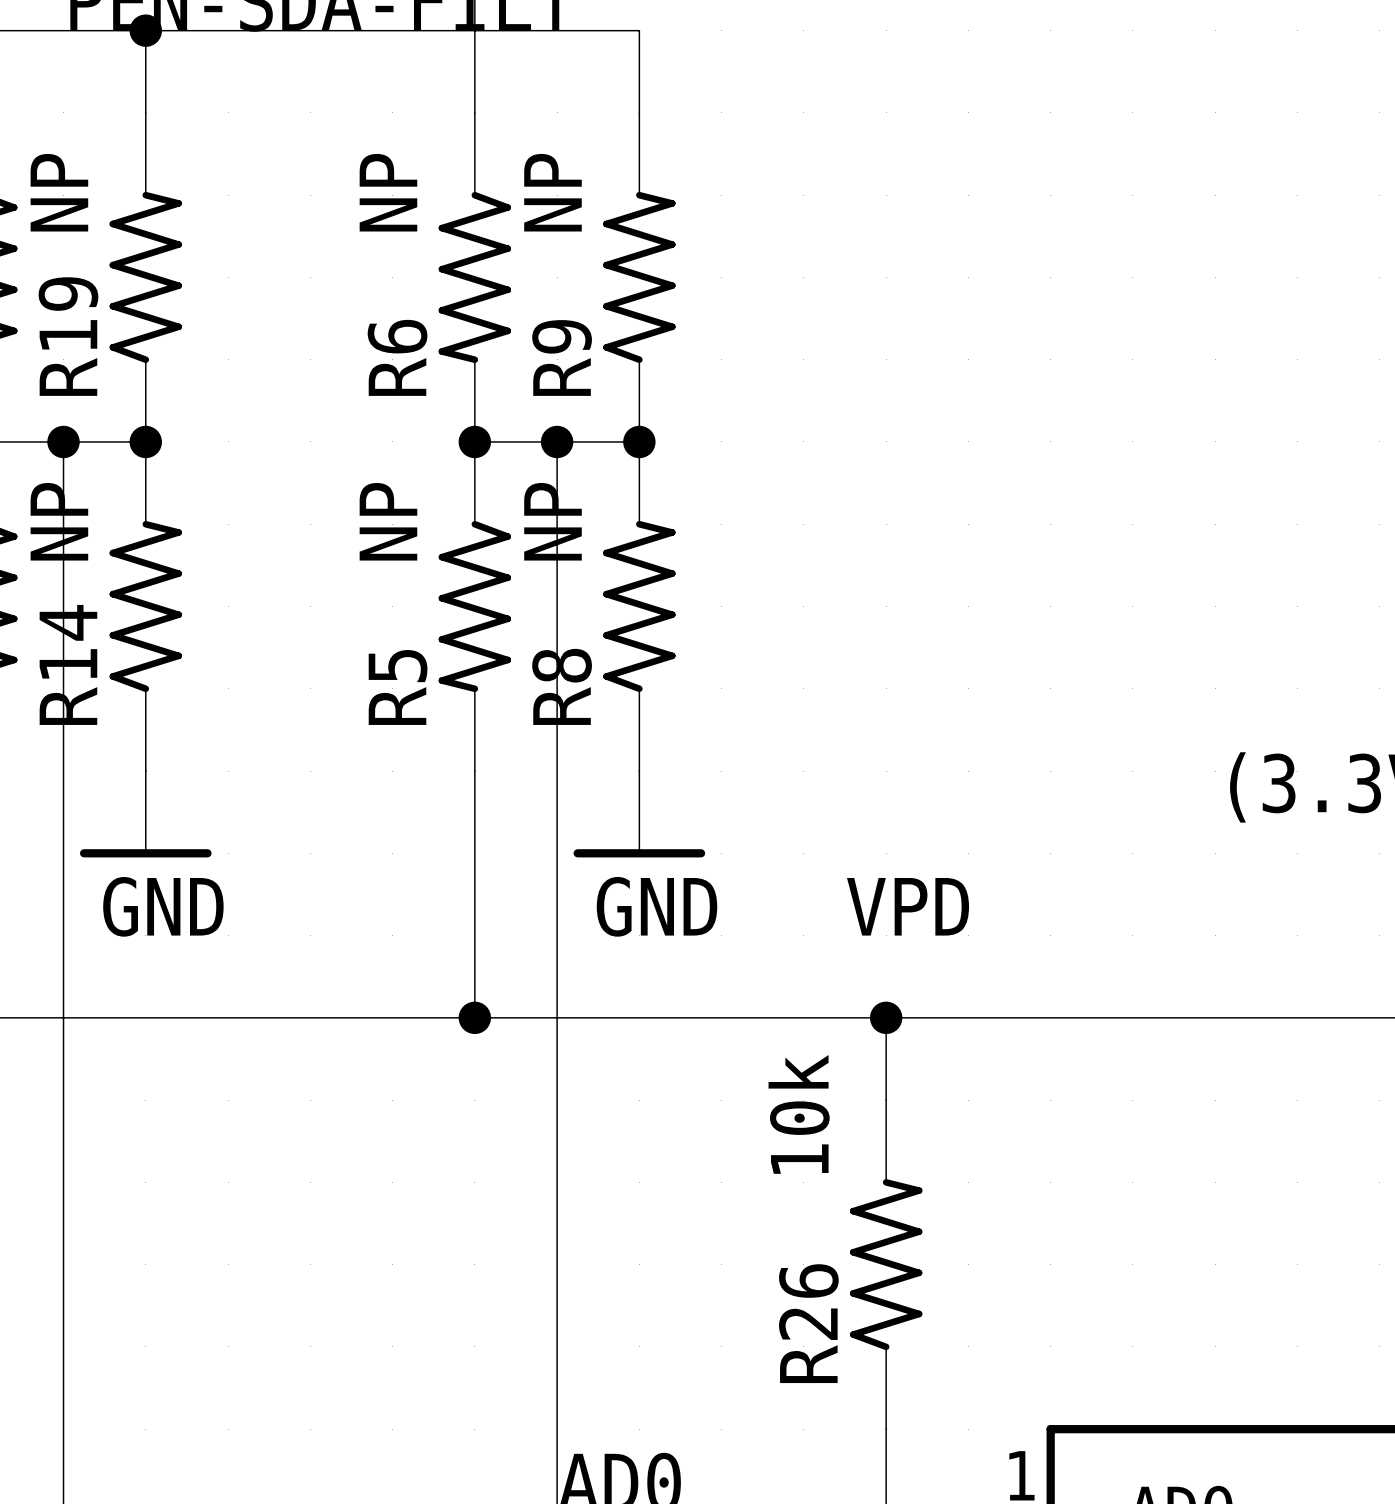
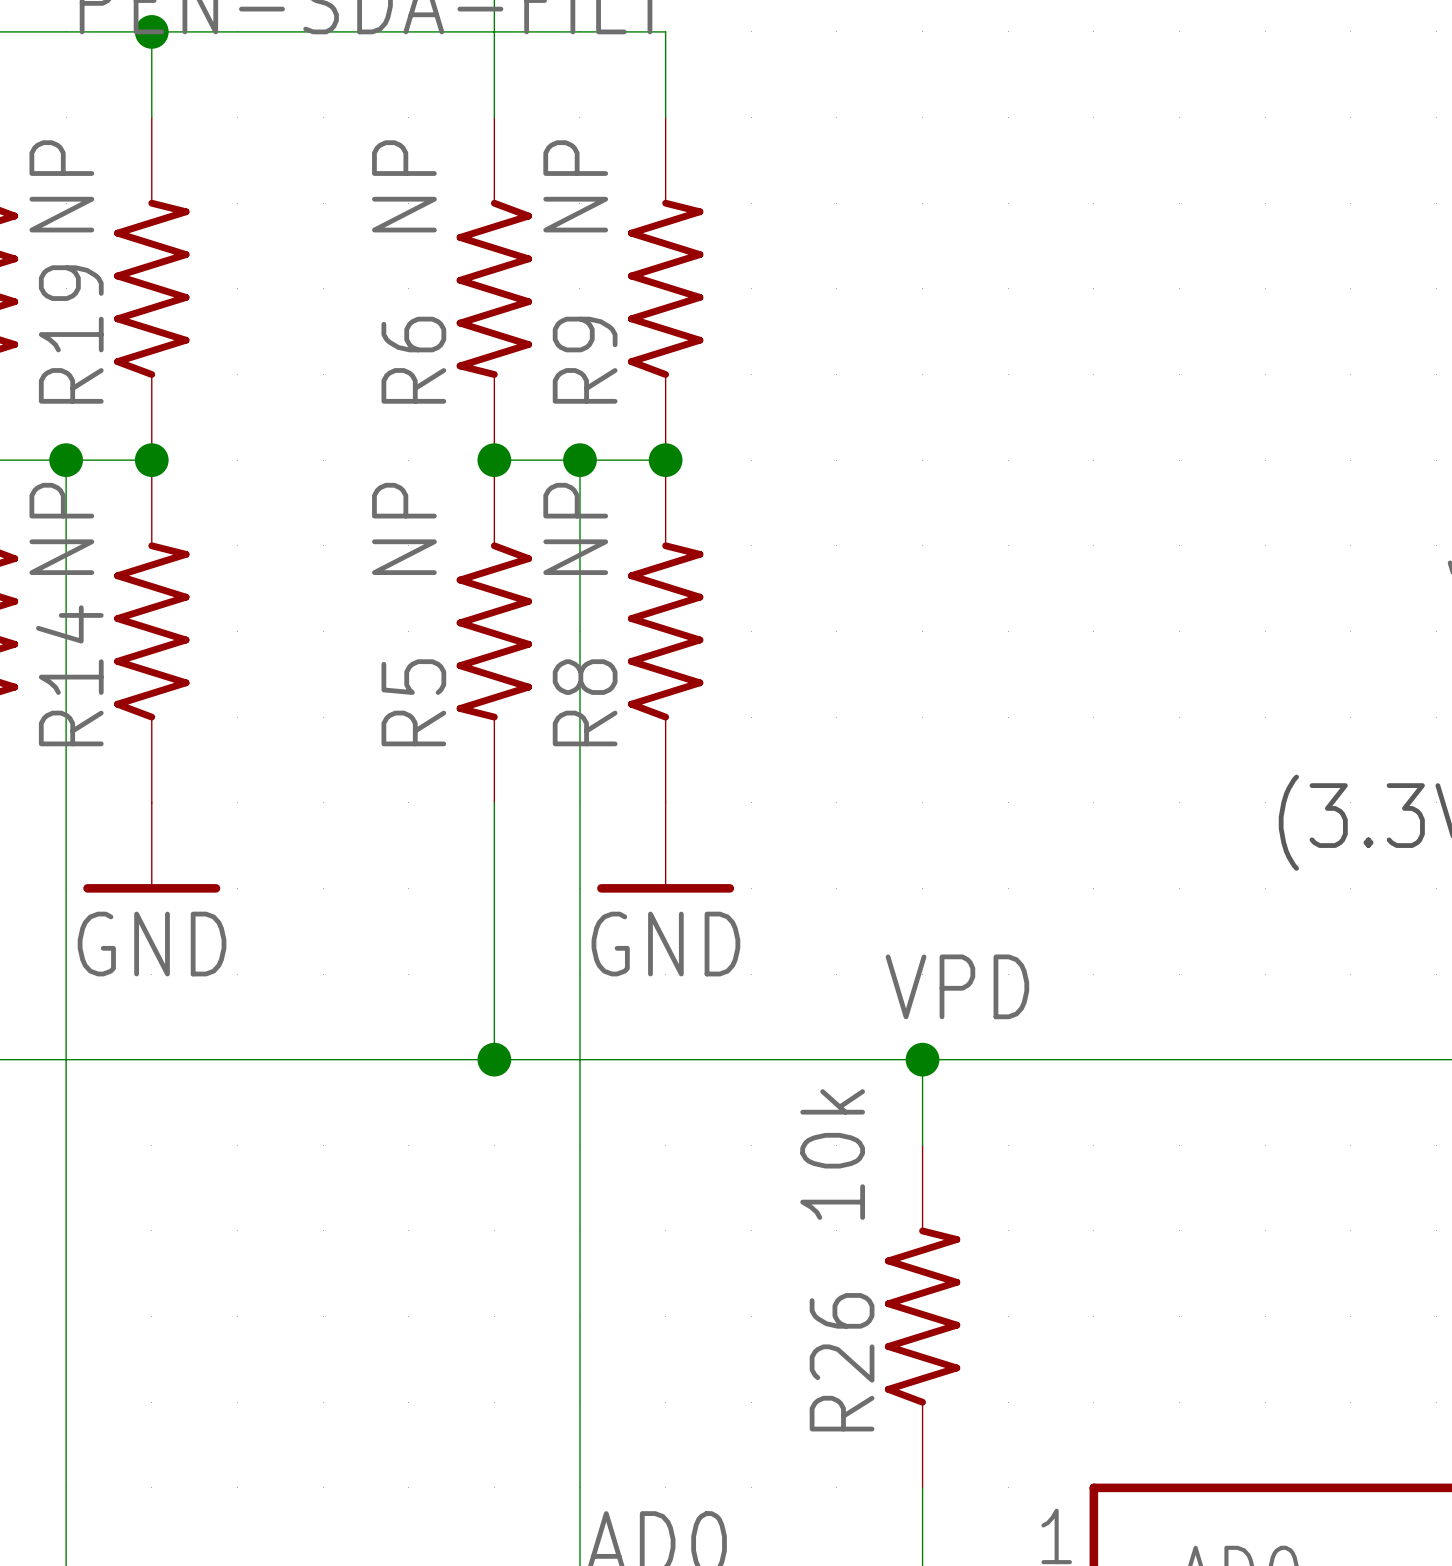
label position: VPD (908, 906) -> VPD (957, 986)

